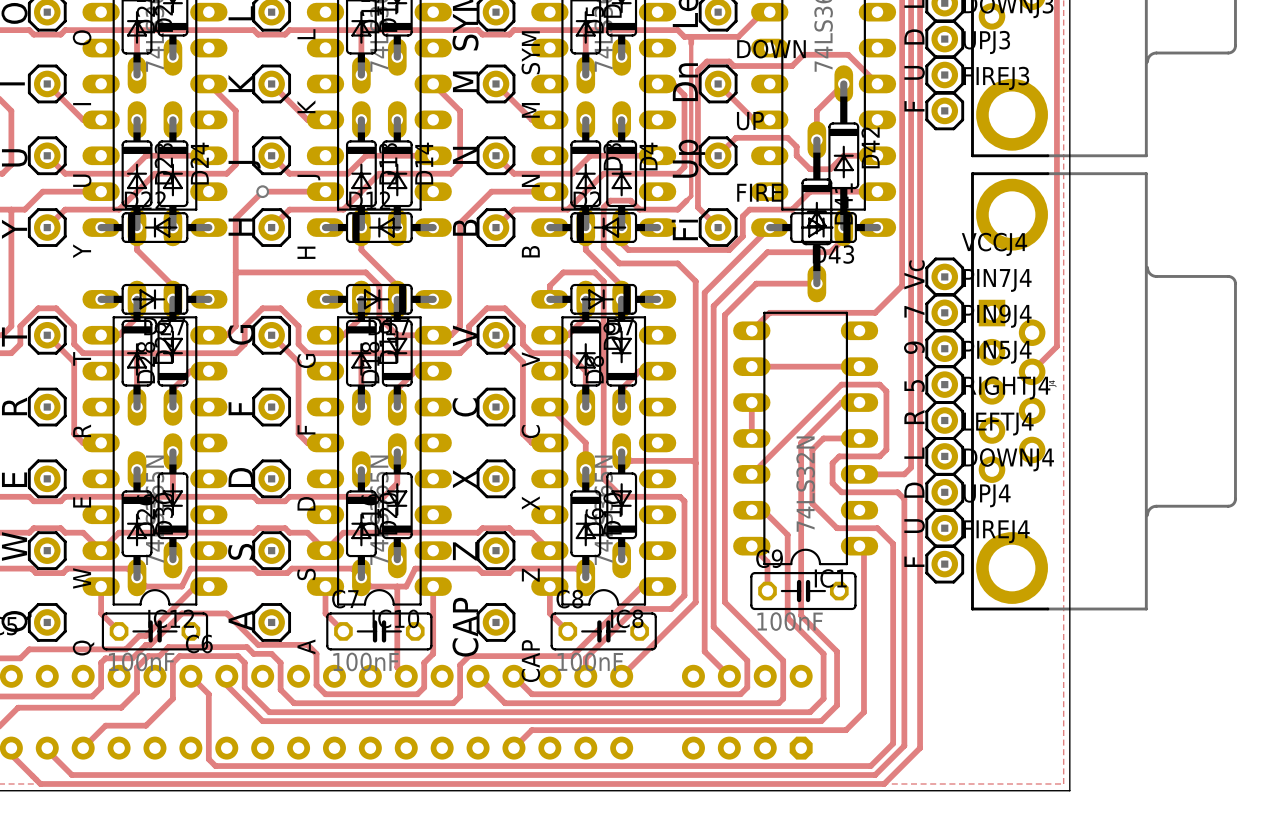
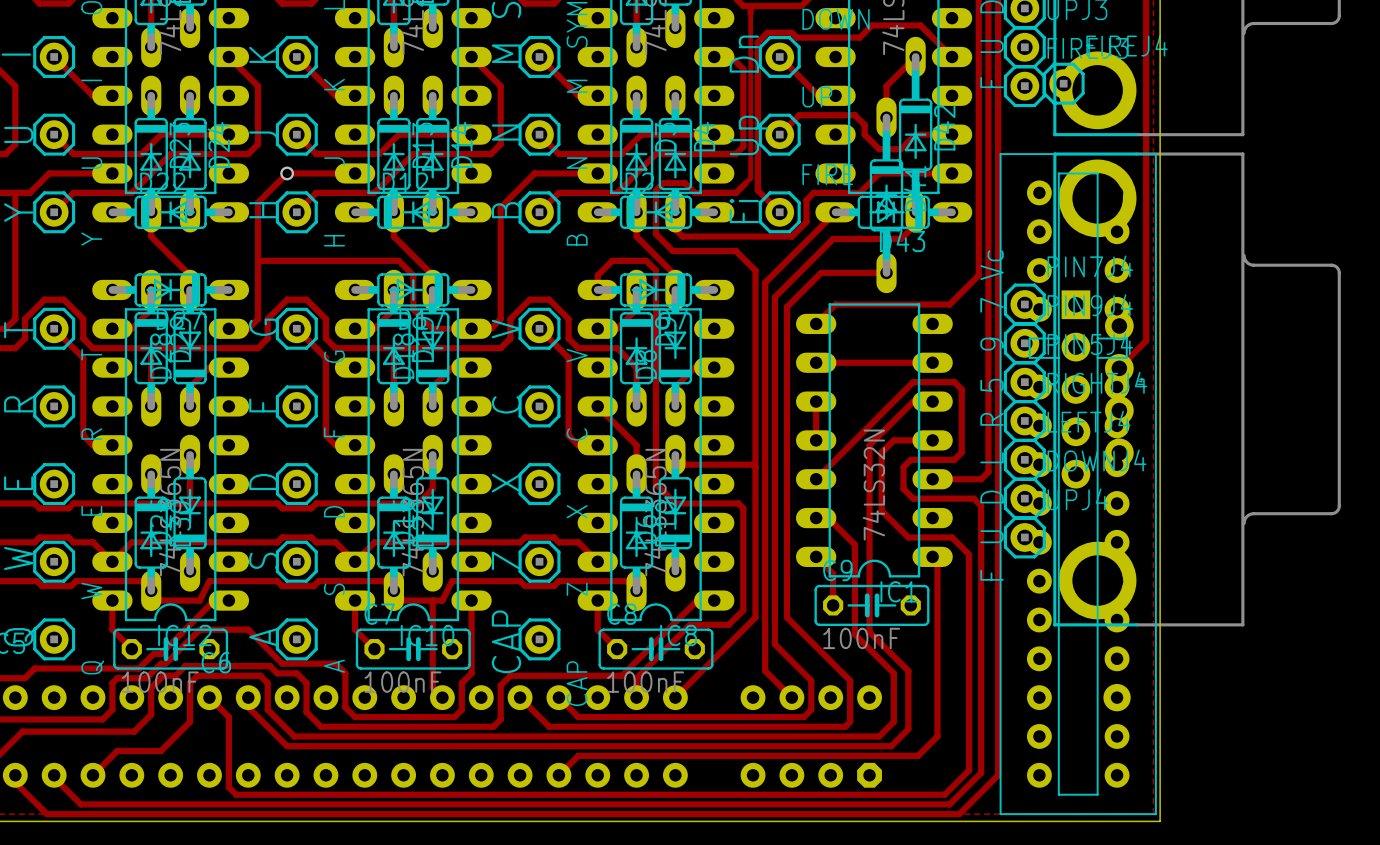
VCCJ4: (944, 276) -> none
part: none -> (1078, 484)
FIREJ4 position: (944, 564) -> (1063, 83)

